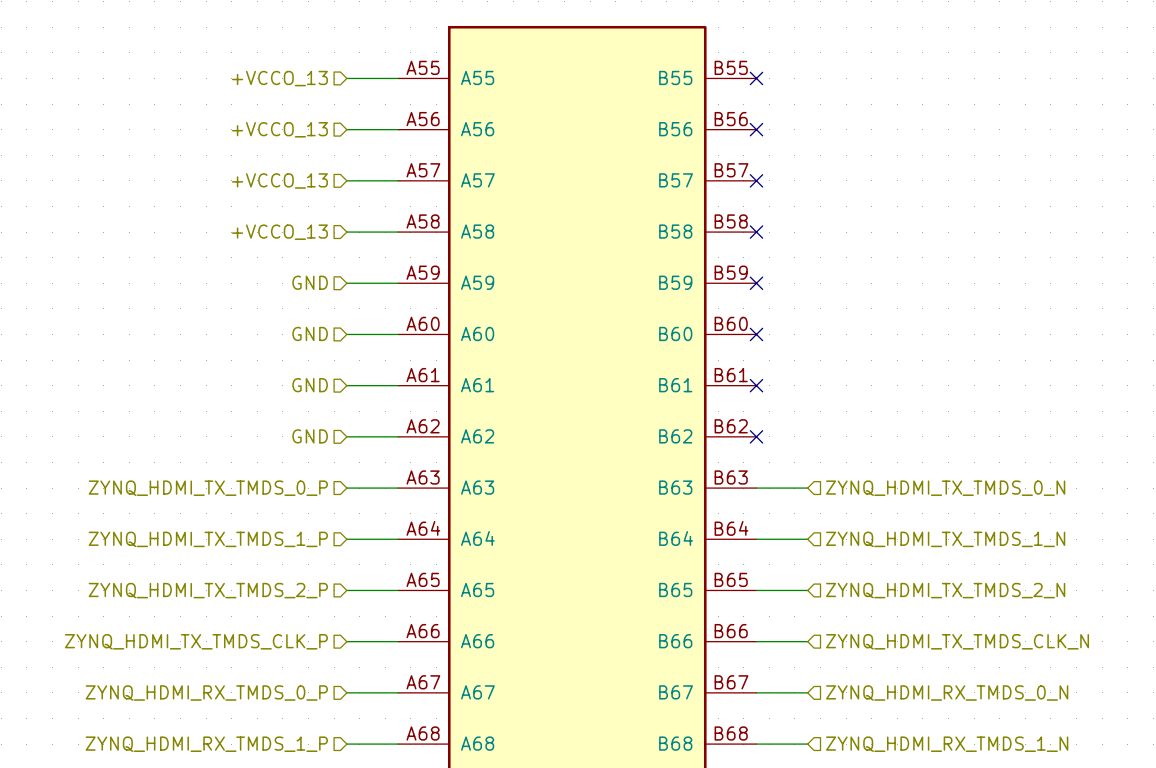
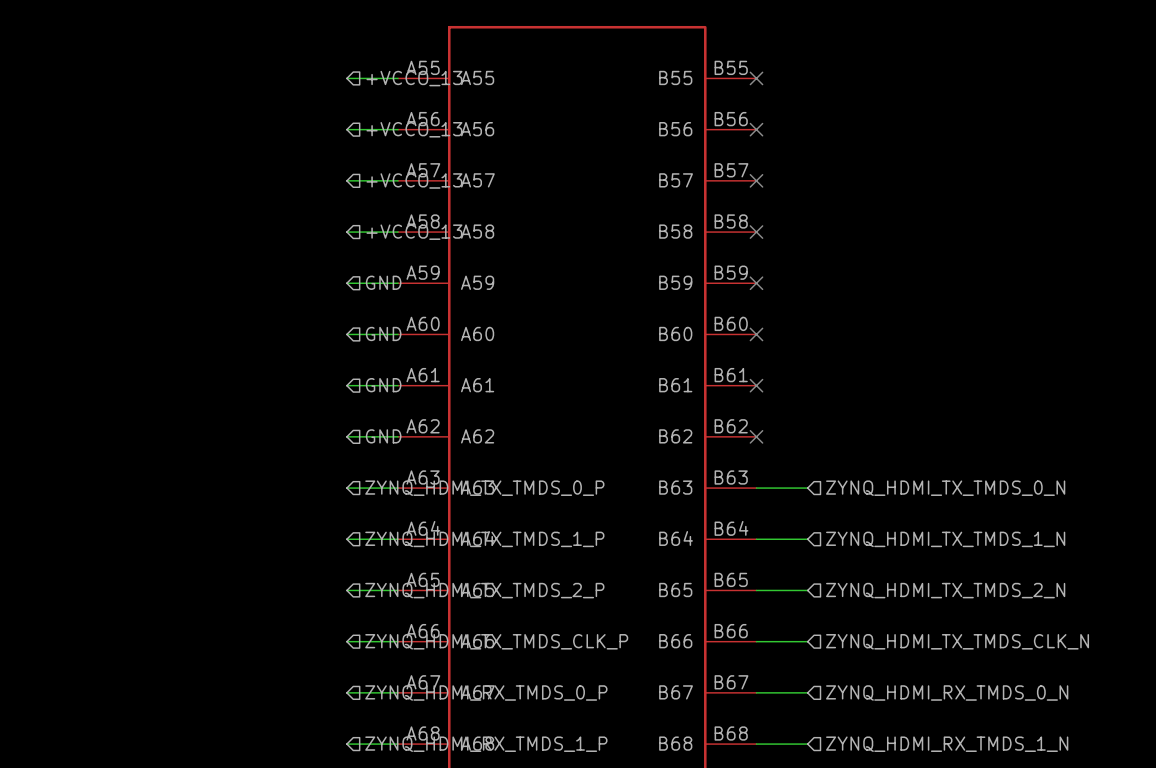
hierarchical label: +VCCO_13 (279, 78) -> none
hierarchical label: none -> +VCCO_13 (414, 78)
hierarchical label: +VCCO_13 (279, 129) -> none
hierarchical label: none -> +VCCO_13 (414, 129)
hierarchical label: +VCCO_13 (279, 180) -> none
hierarchical label: none -> +VCCO_13 (414, 180)
hierarchical label: +VCCO_13 (279, 232) -> none
hierarchical label: none -> +VCCO_13 (414, 232)
hierarchical label: GND (310, 282) -> none
hierarchical label: none -> GND (383, 282)
hierarchical label: GND (310, 333) -> none
hierarchical label: none -> GND (383, 333)
hierarchical label: GND (310, 385) -> none
hierarchical label: none -> GND (383, 385)
hierarchical label: GND (310, 436) -> none
hierarchical label: none -> GND (383, 436)
hierarchical label rotation: 0° (208, 488) -> 180° (484, 488)
hierarchical label position: ZYNQ_HDMI_TX_TMDS_0_P (208, 488) -> ZYNQ_HDMI_TX_TMDS_0_P (484, 488)
hierarchical label rotation: 0° (208, 539) -> 180° (484, 539)
hierarchical label position: ZYNQ_HDMI_TX_TMDS_1_P (208, 539) -> ZYNQ_HDMI_TX_TMDS_1_P (484, 539)
hierarchical label rotation: 0° (208, 590) -> 180° (484, 590)
hierarchical label position: ZYNQ_HDMI_TX_TMDS_2_P (208, 590) -> ZYNQ_HDMI_TX_TMDS_2_P (484, 590)
hierarchical label rotation: 0° (196, 641) -> 180° (496, 641)
hierarchical label position: ZYNQ_HDMI_TX_TMDS_CLK_P (196, 641) -> ZYNQ_HDMI_TX_TMDS_CLK_P (496, 641)
hierarchical label rotation: 0° (206, 693) -> 180° (486, 693)
hierarchical label position: ZYNQ_HDMI_RX_TMDS_0_P (206, 693) -> ZYNQ_HDMI_RX_TMDS_0_P (486, 693)
hierarchical label rotation: 0° (206, 744) -> 180° (486, 744)
hierarchical label position: ZYNQ_HDMI_RX_TMDS_1_P (206, 744) -> ZYNQ_HDMI_RX_TMDS_1_P (486, 744)

